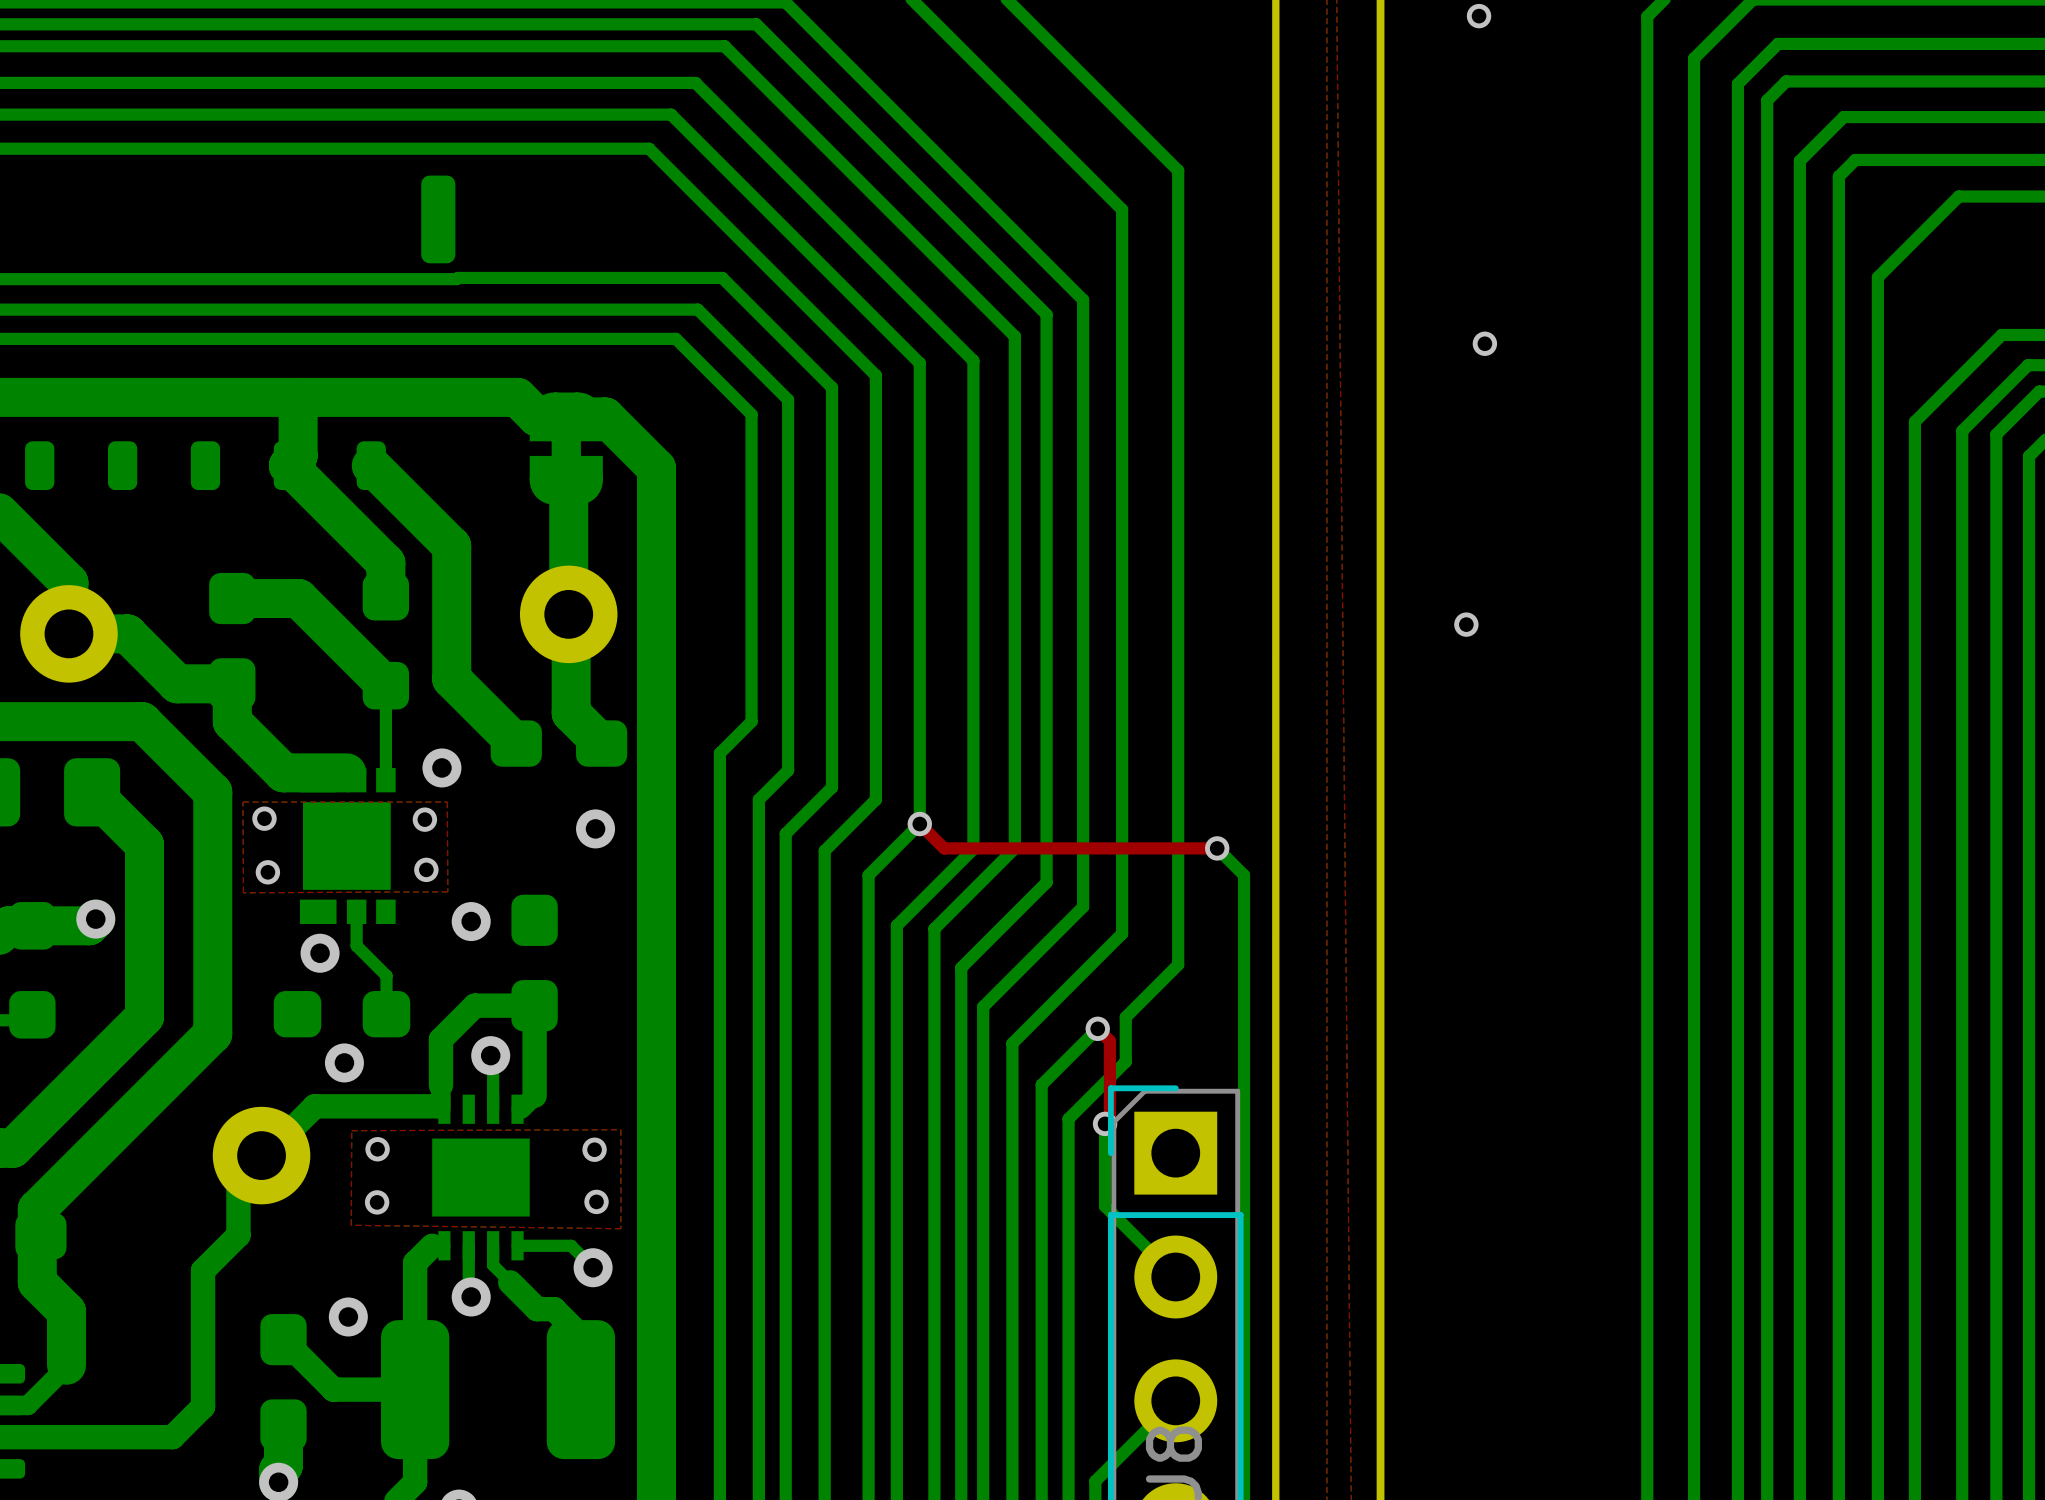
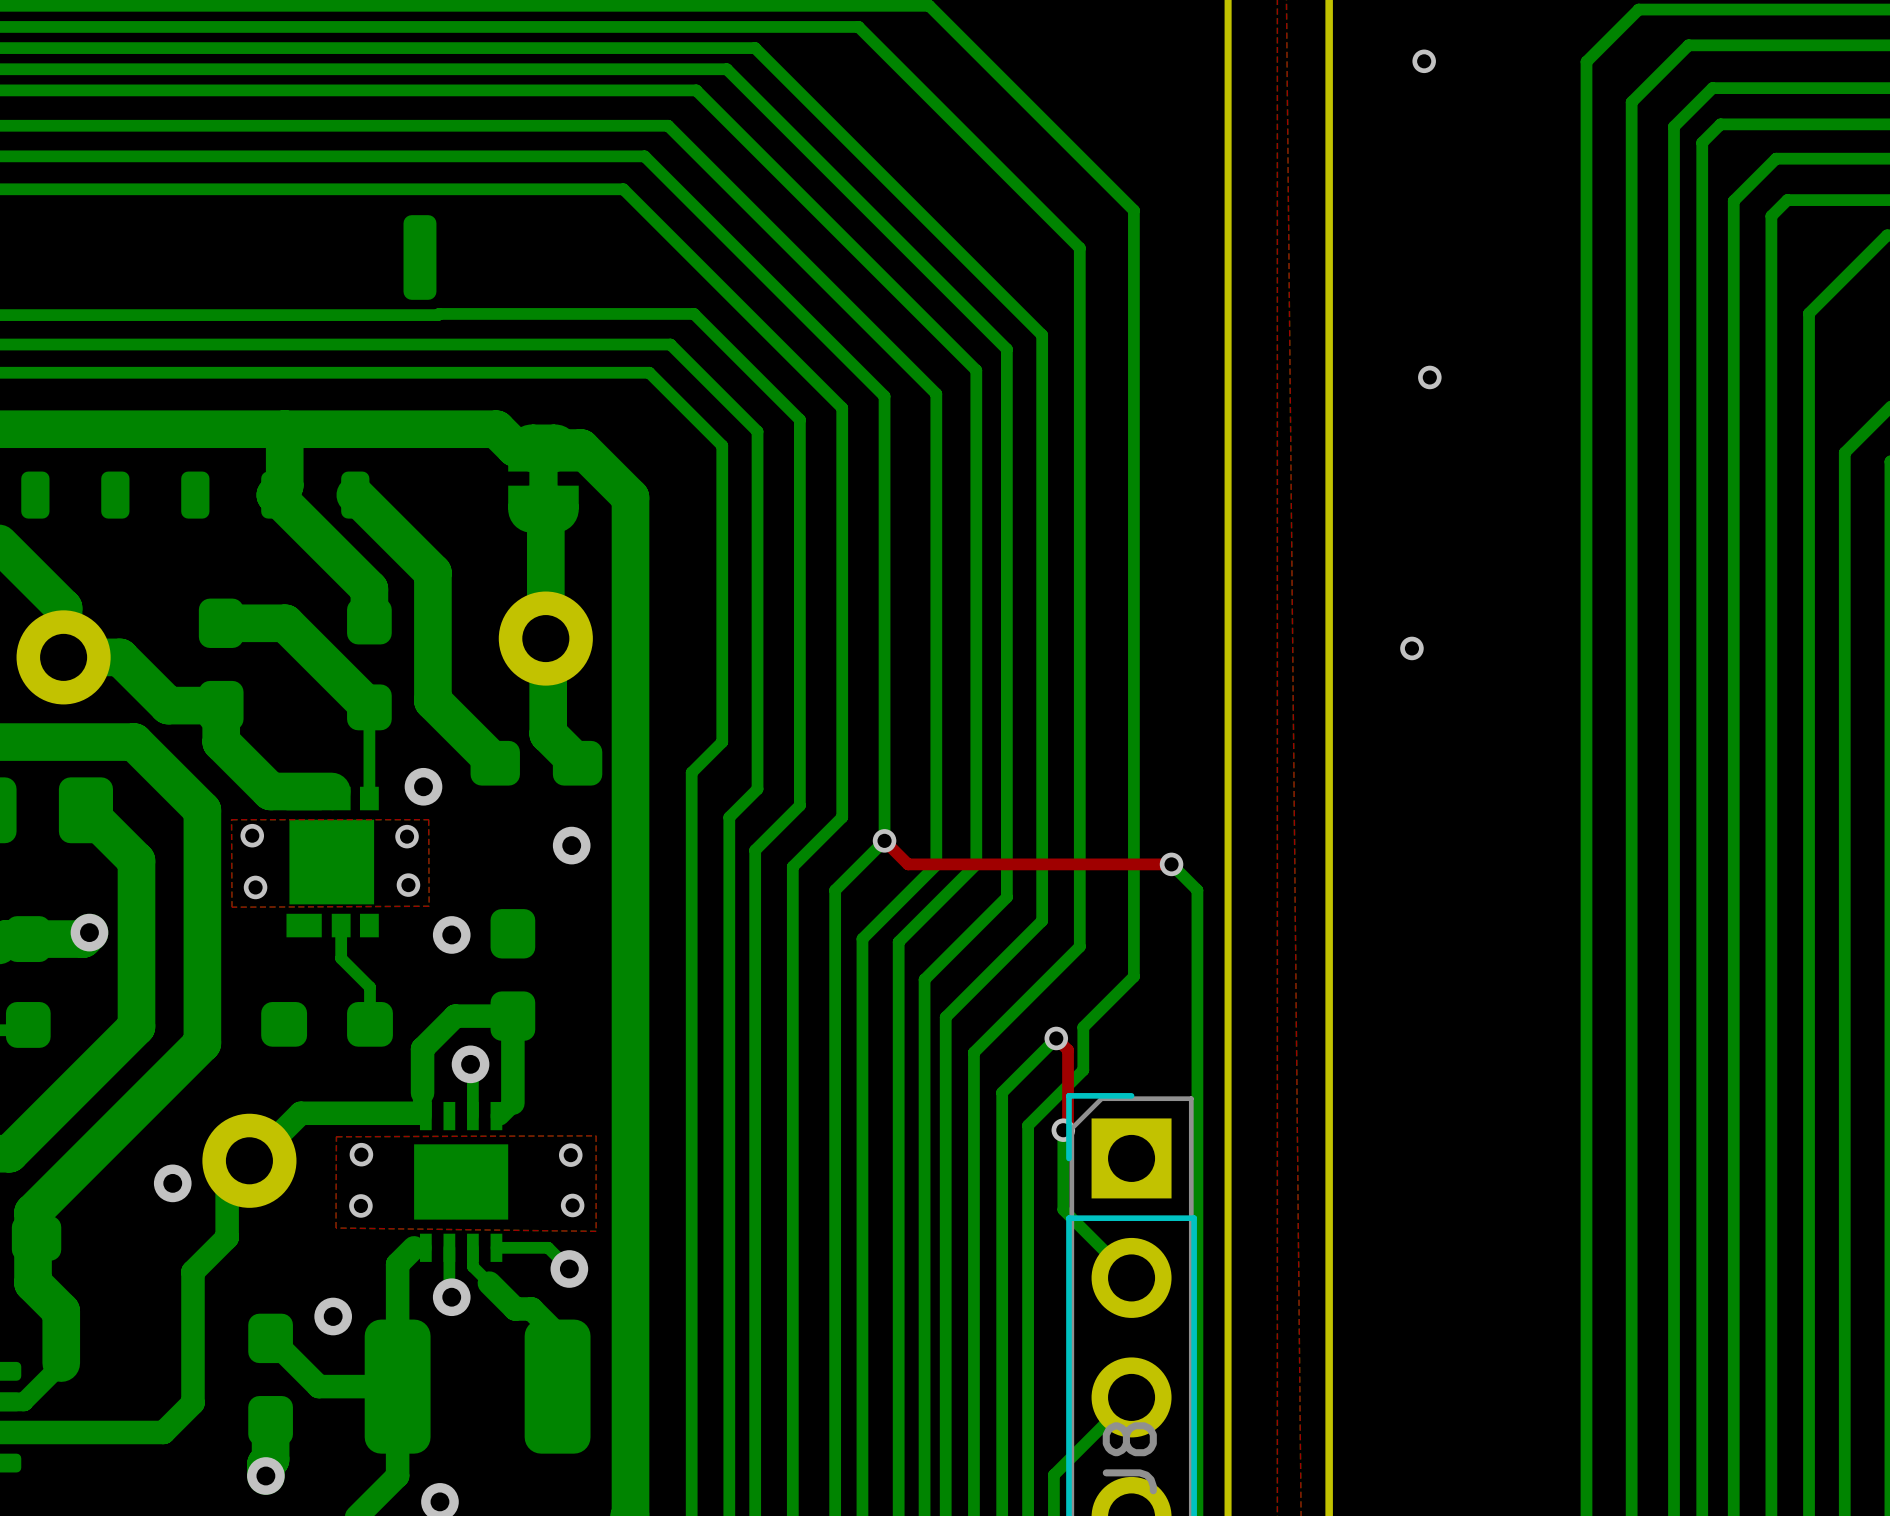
via: (320, 953) -> none
via: (344, 1062) -> none
via: none -> (172, 1183)

